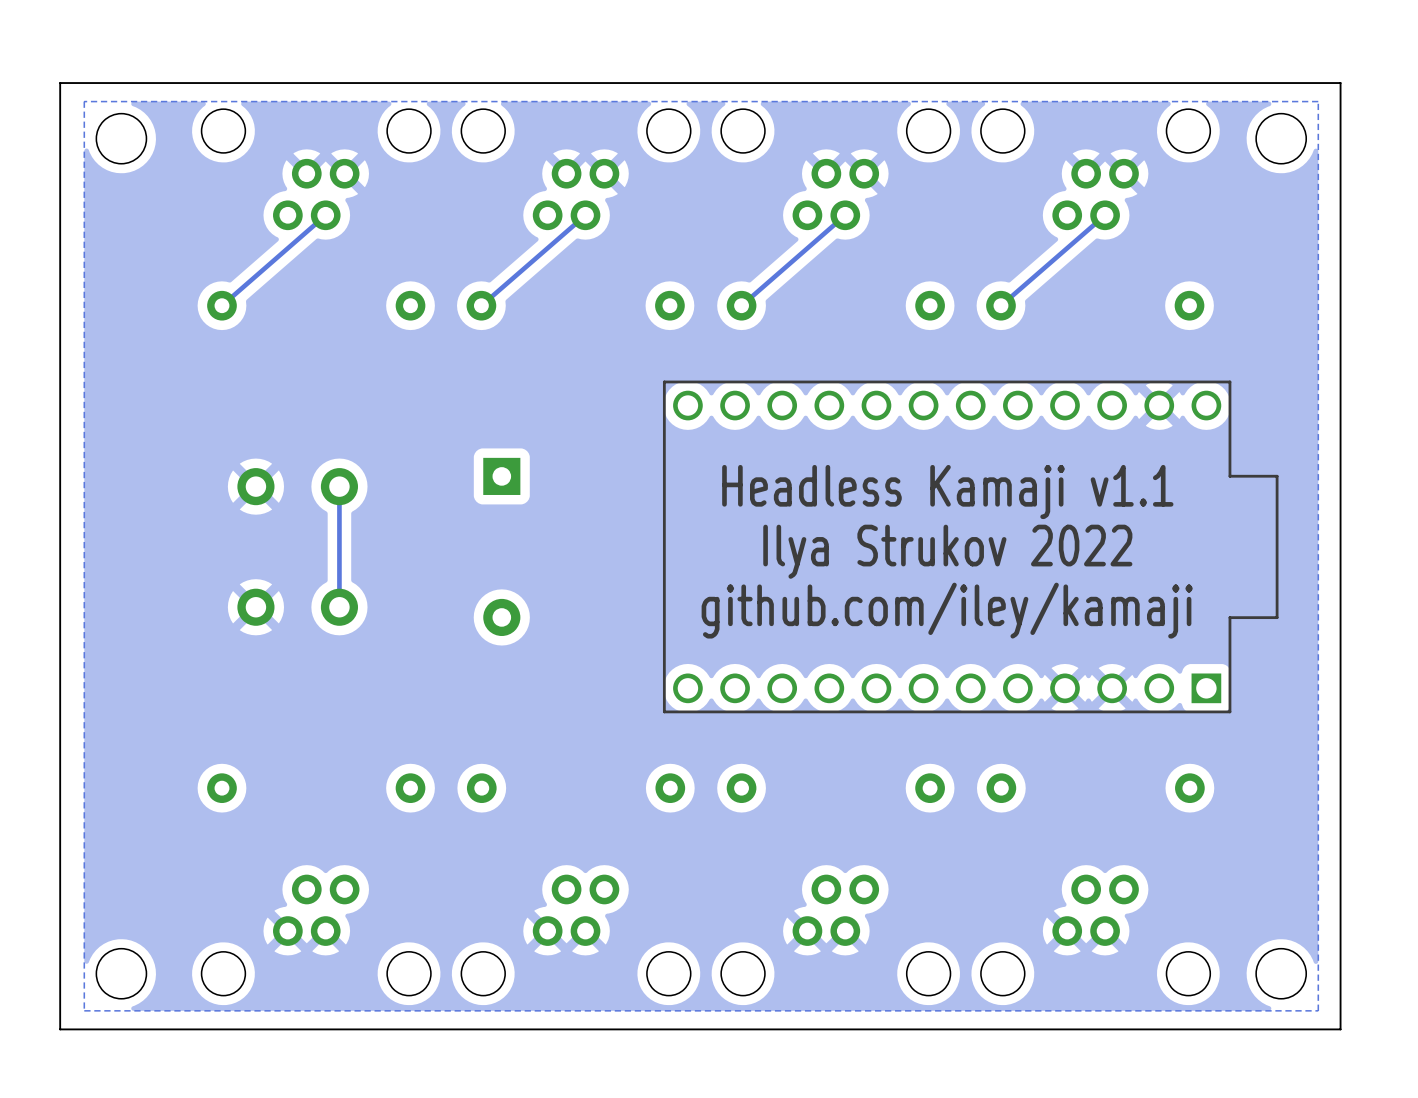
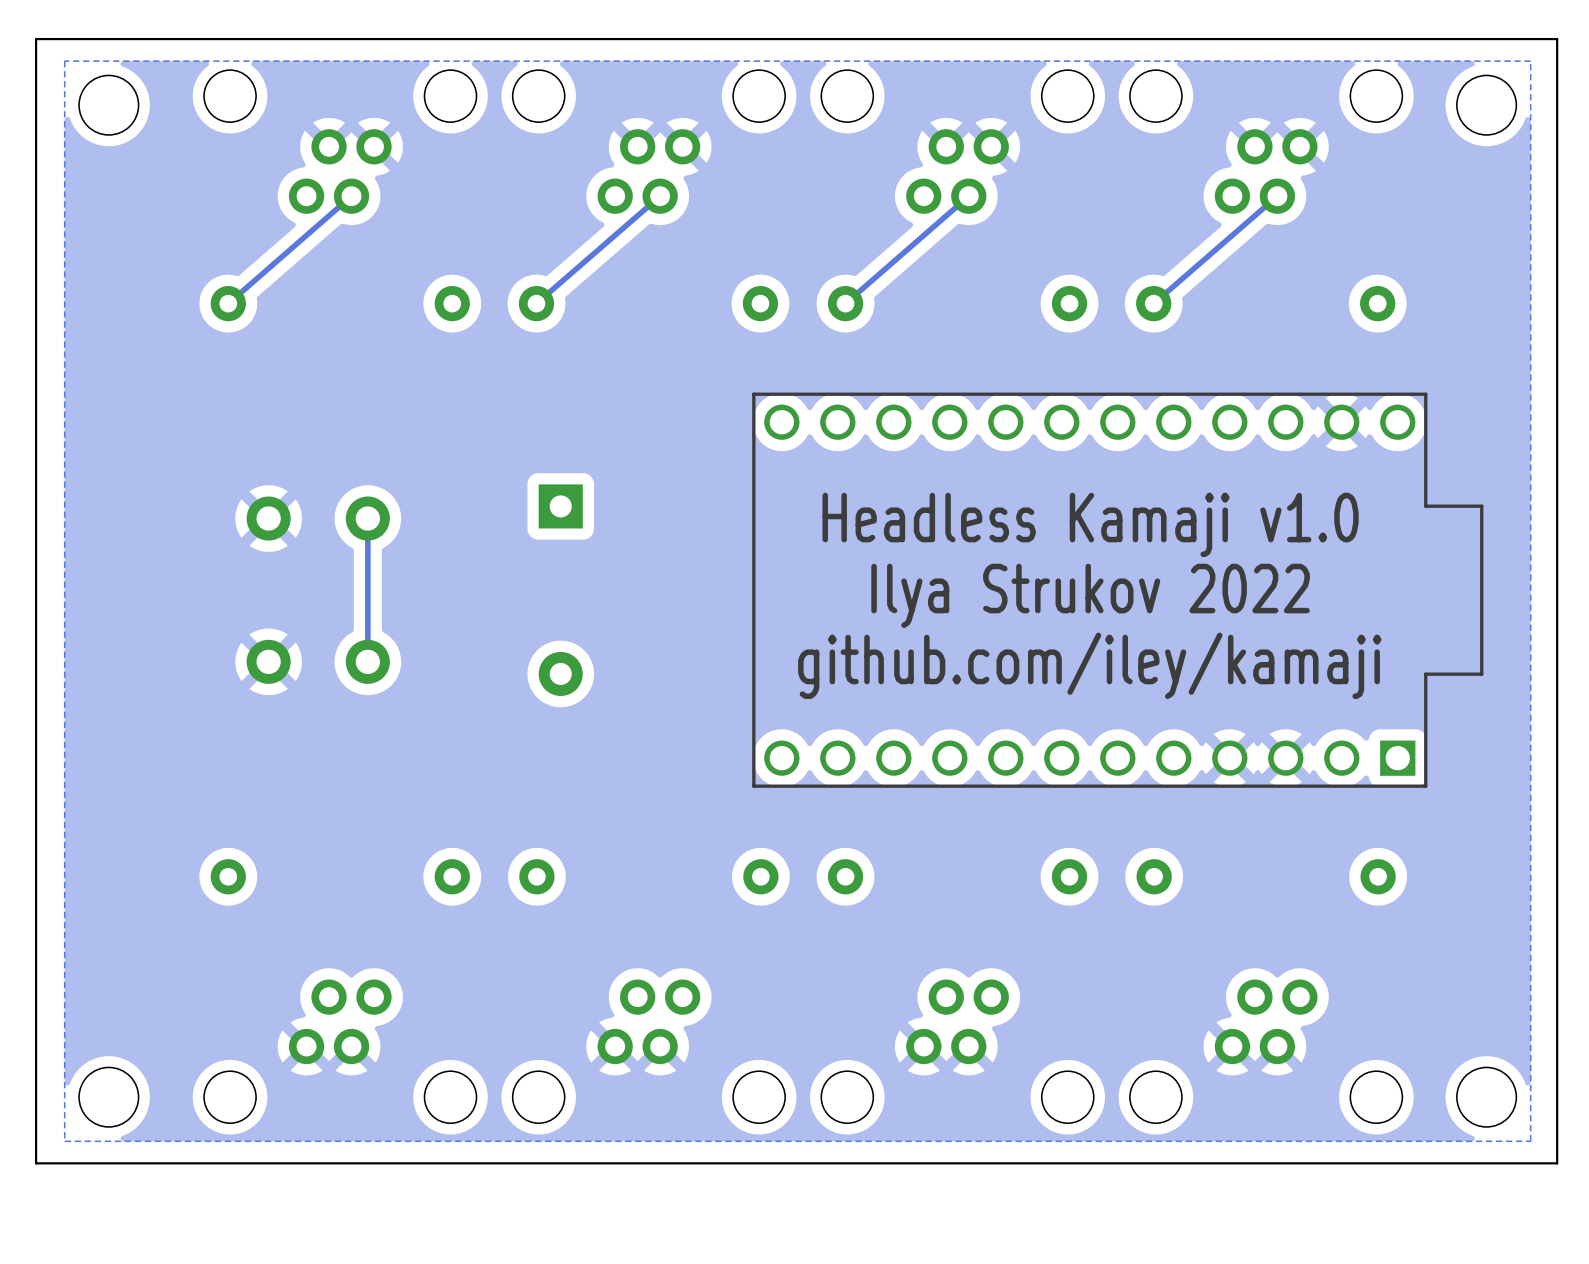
text: Headless Kamaji v1.1 (947, 491) -> Headless Kamaji v1.0 (1090, 524)

